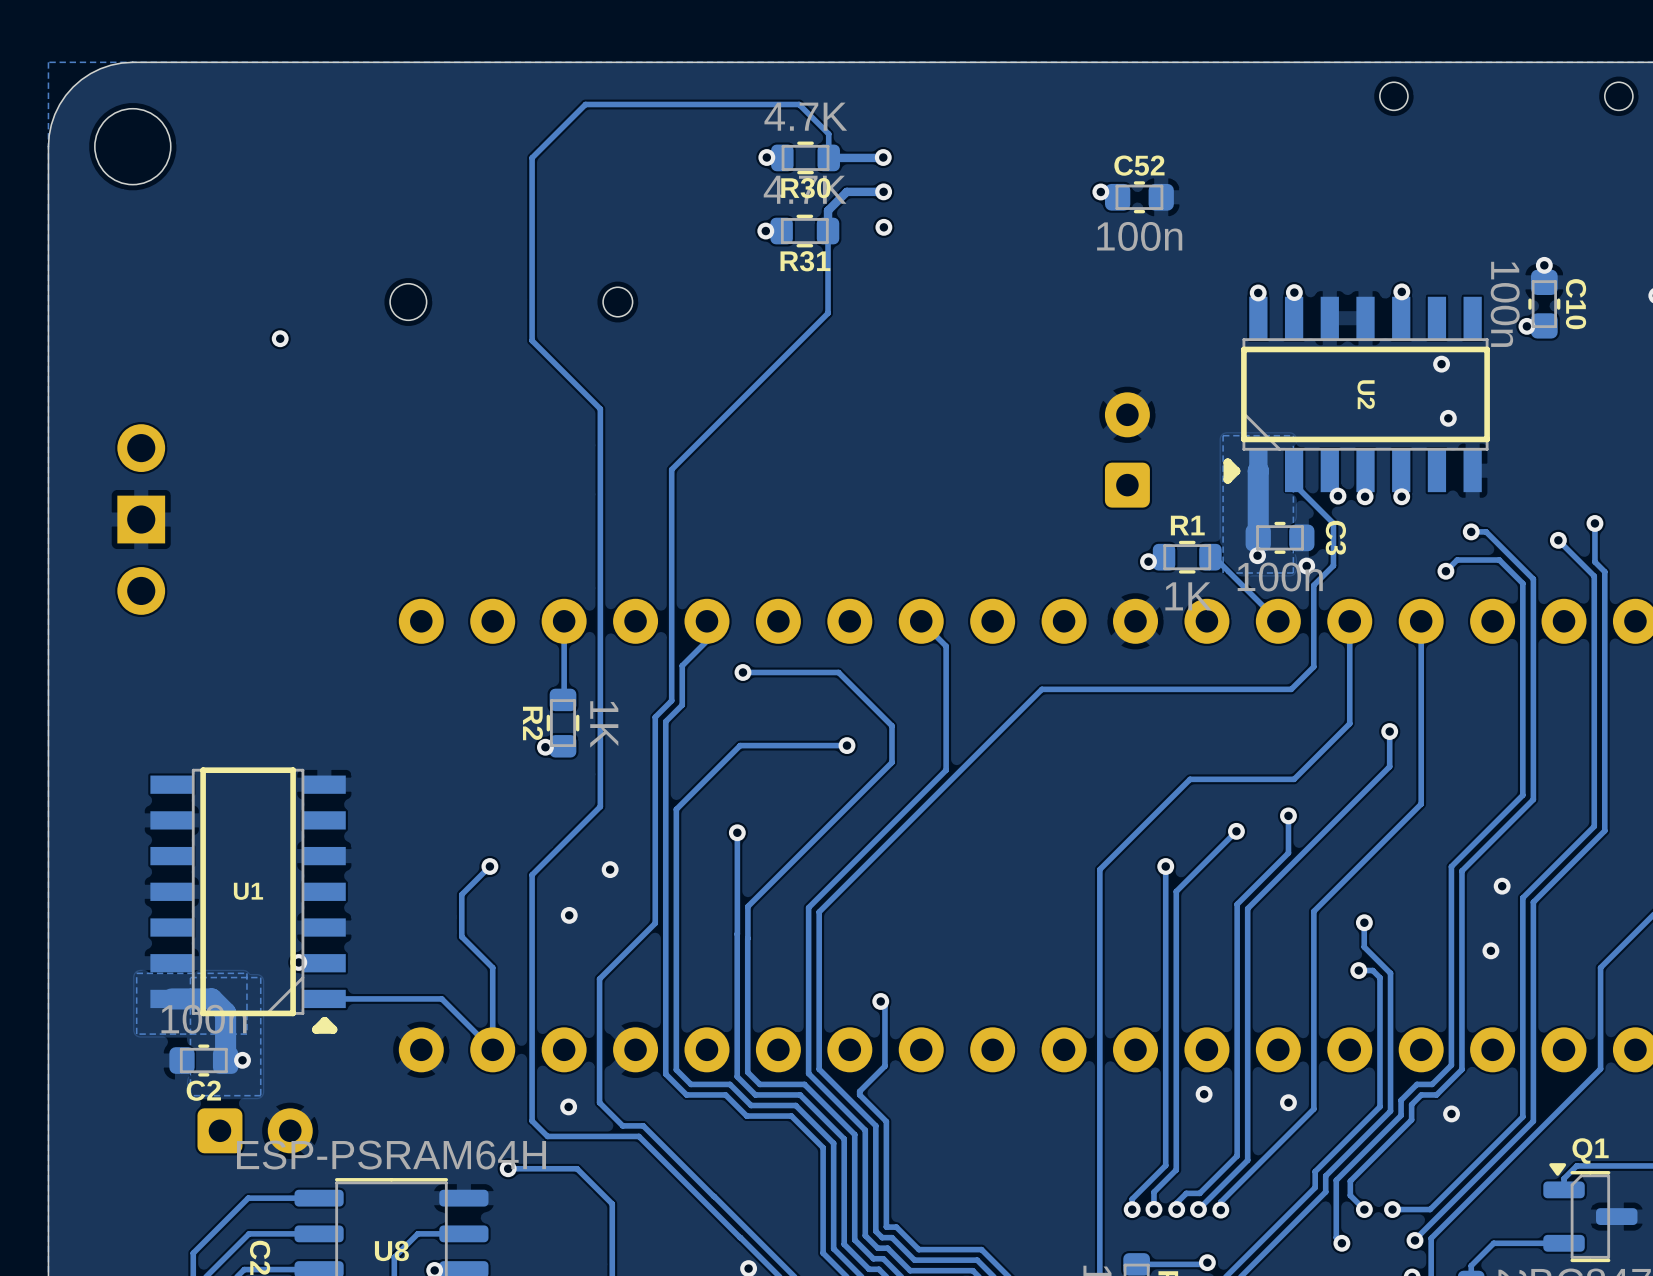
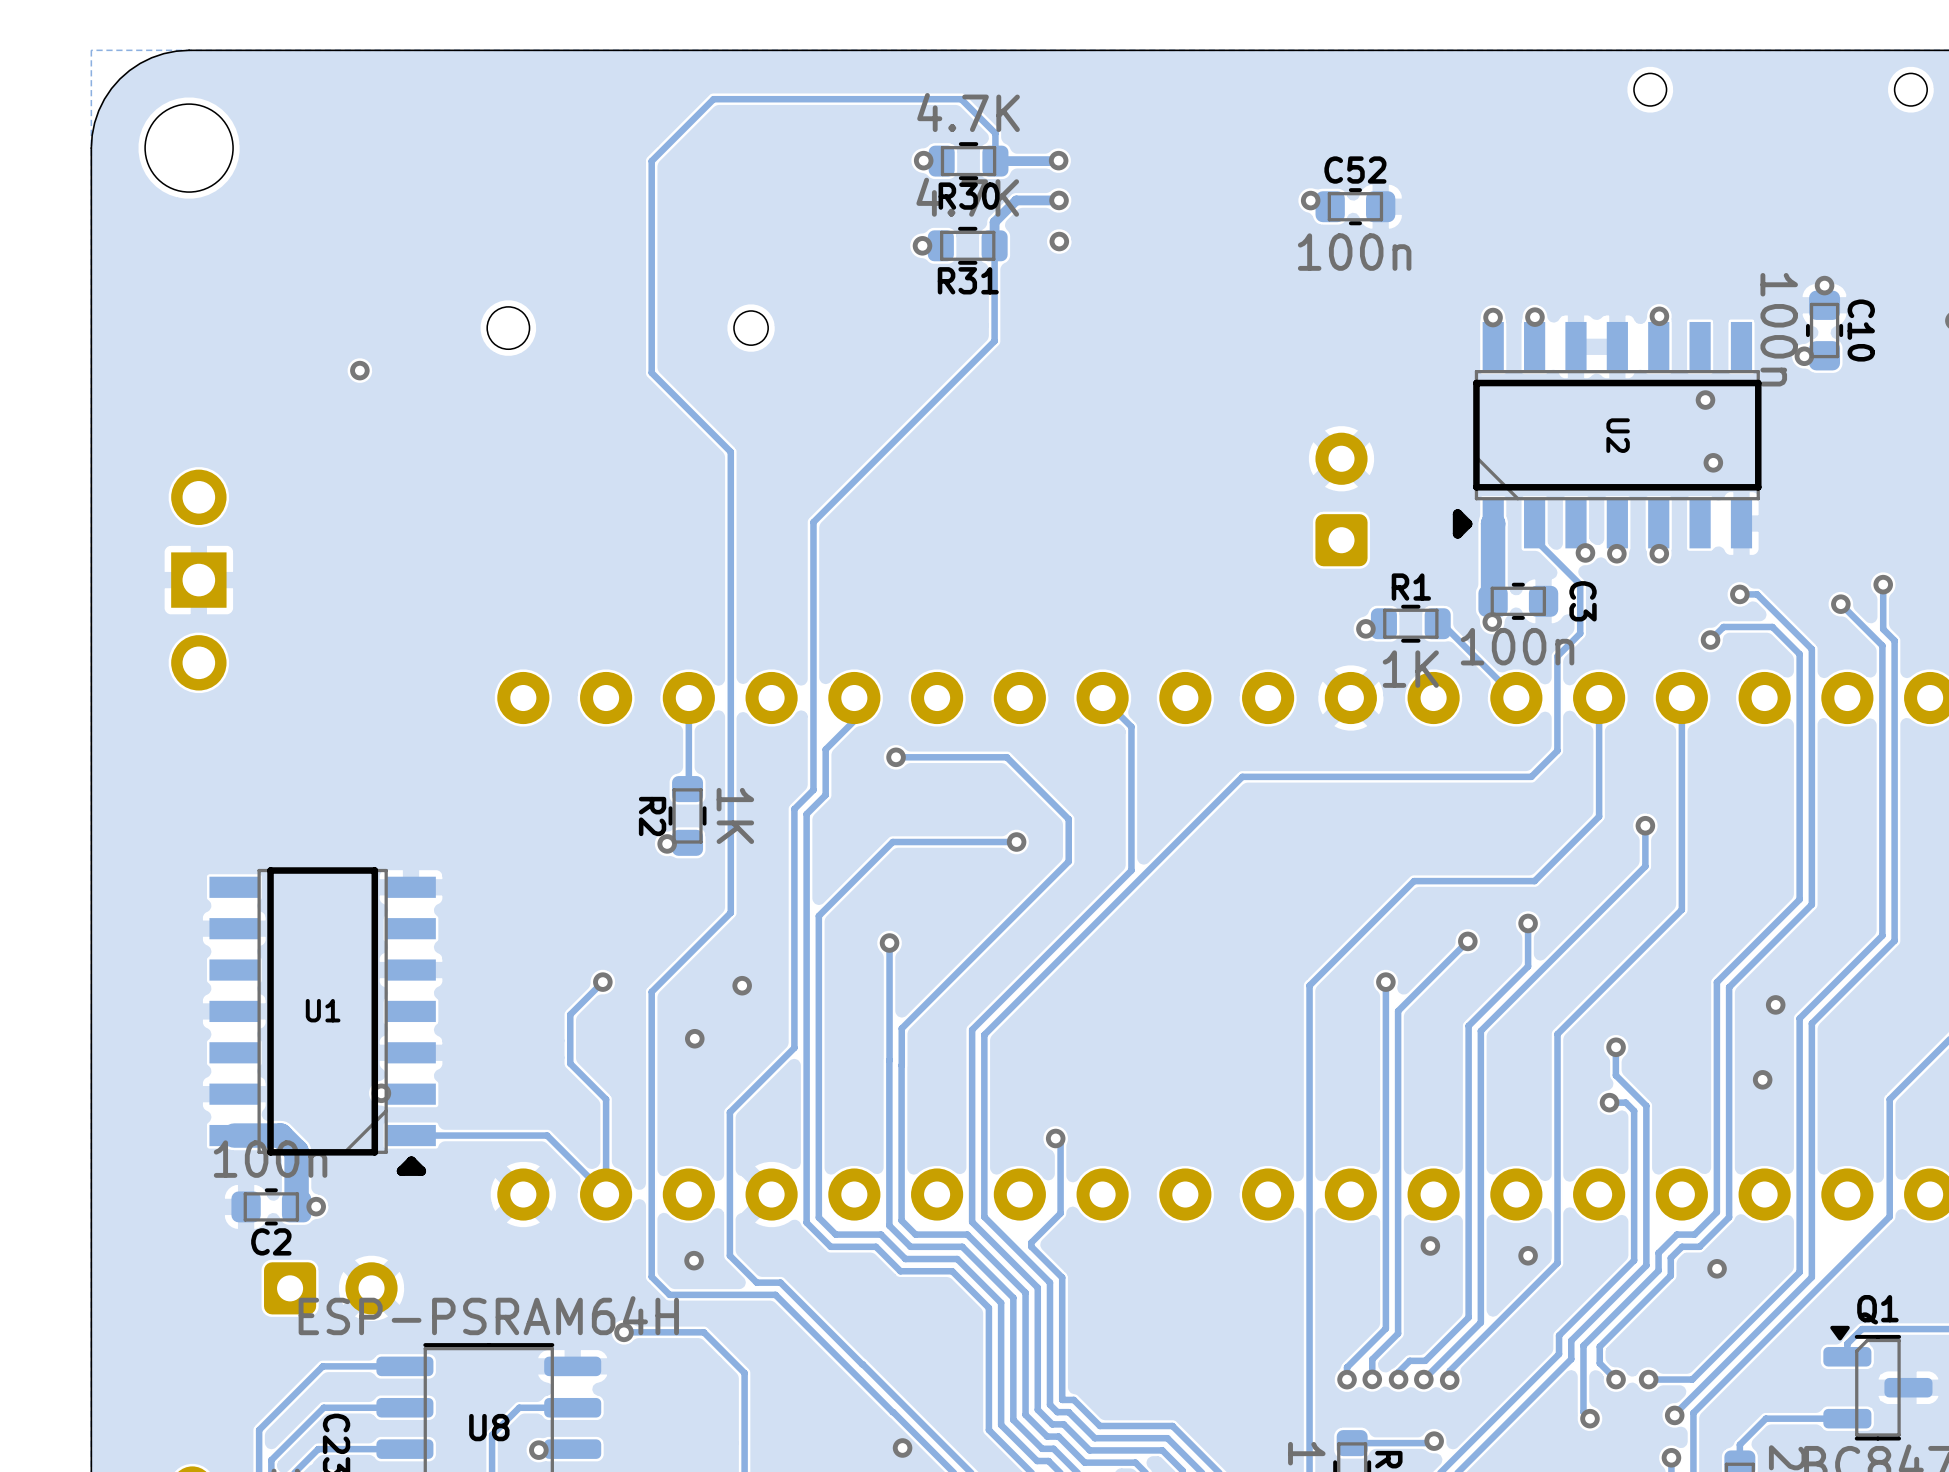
zone outline: (1293, 435) (1223, 435) (1223, 573) (1293, 573) (1293, 435) -> none
via: (1306, 566) -> none
zone outline: (246, 973) (136, 973) (136, 1034) (246, 1034) (246, 973) -> none
zone outline: (260, 977) (260, 1095) (190, 1095) (190, 977) (260, 977) -> none

